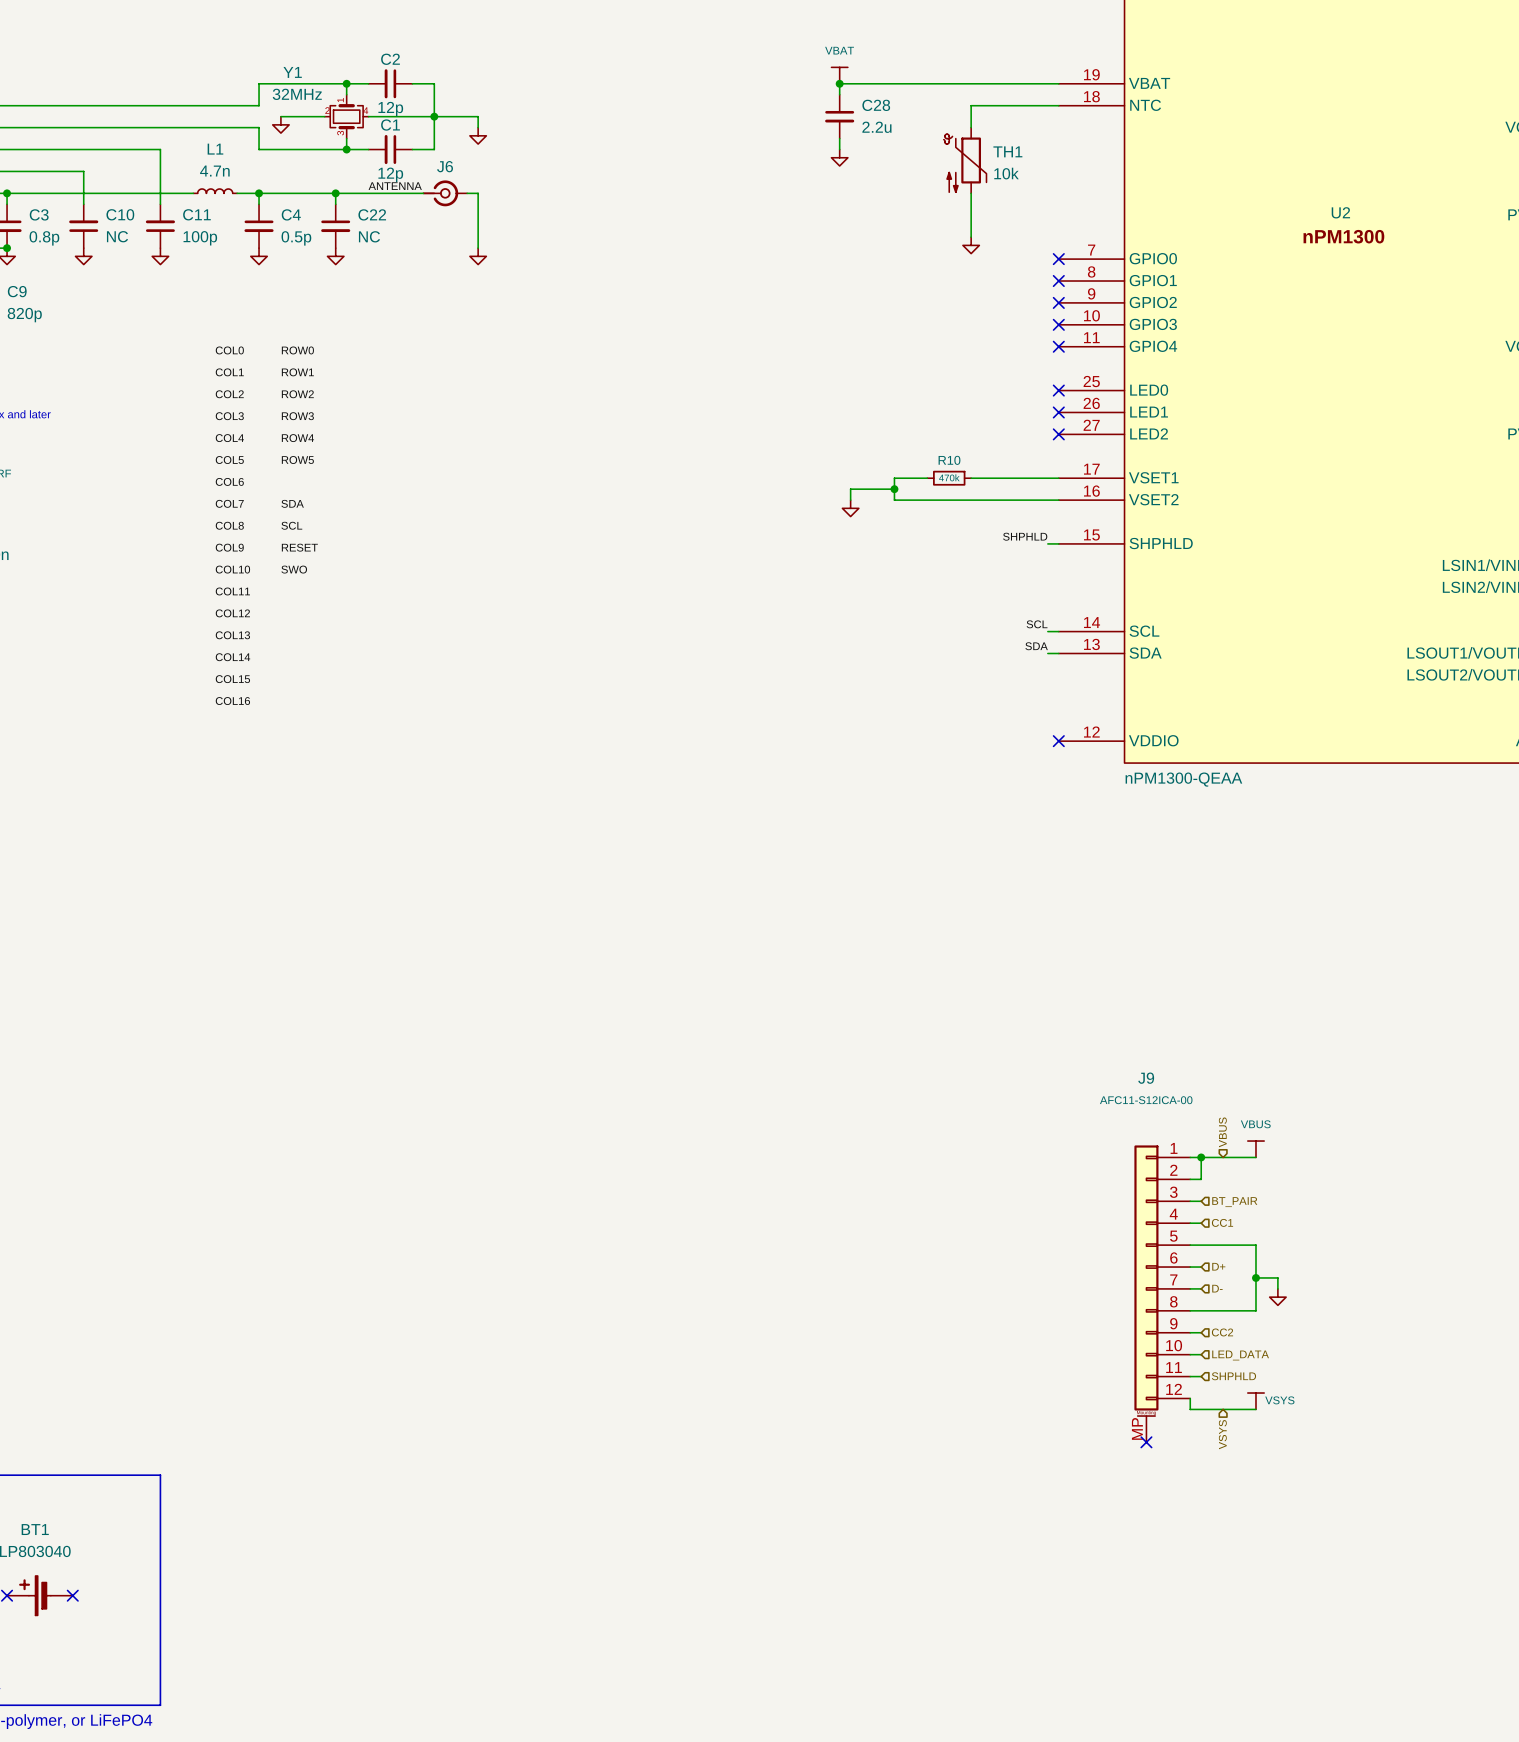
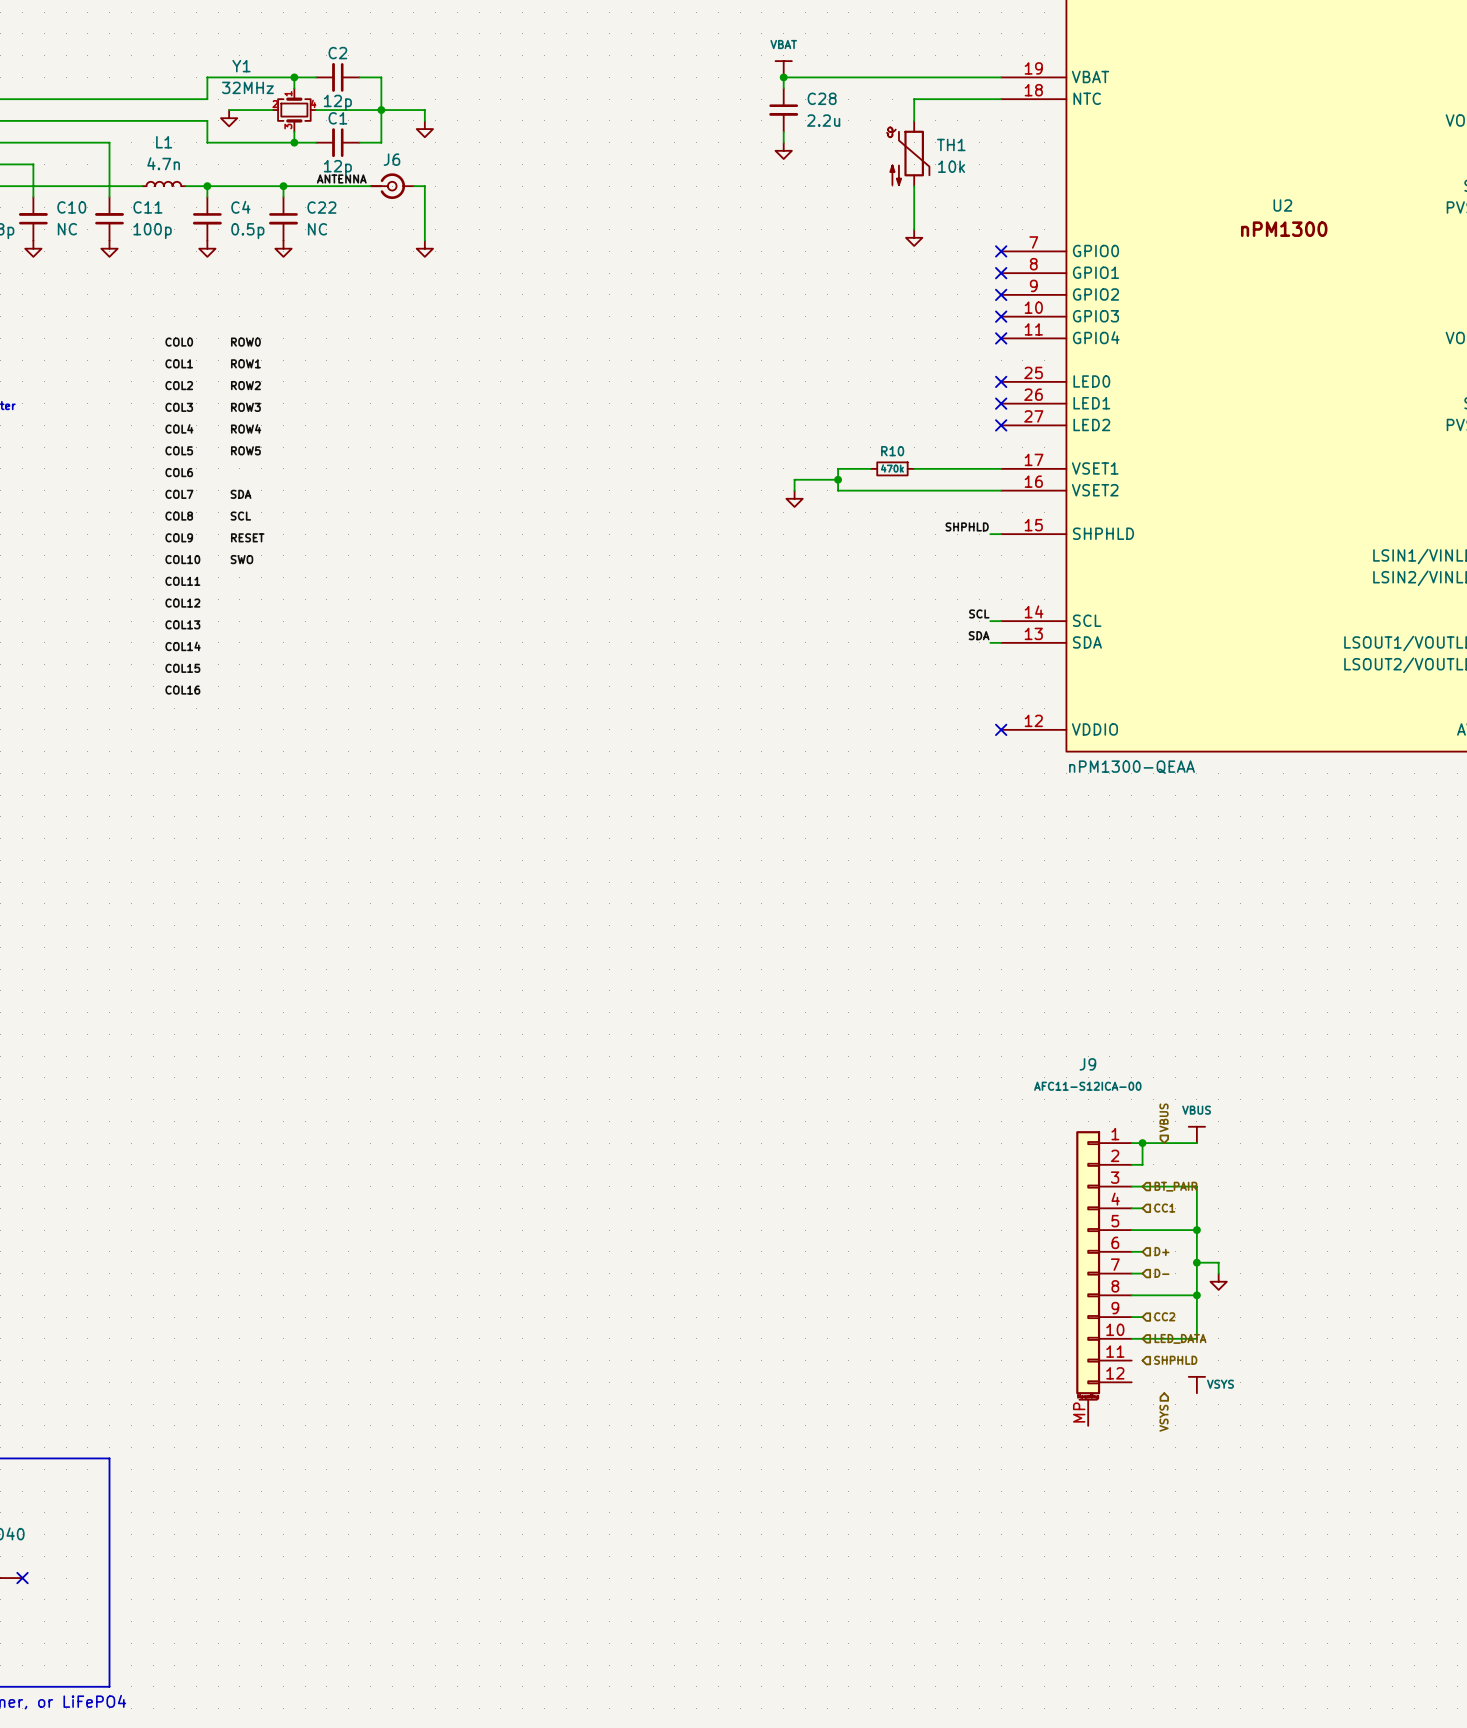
wire: none -> (1142, 1186) (1196, 1186) (1196, 1230)
junction: none -> (1196, 1230)
wire: none -> (1196, 1295) (1196, 1338) (1142, 1338)
junction: none -> (1196, 1295)
wire: (1190, 1376) (1201, 1376) -> none
wire: (1190, 1398) (1190, 1409) (1255, 1409) -> none
no-connect mark: (1146, 1442) -> none

